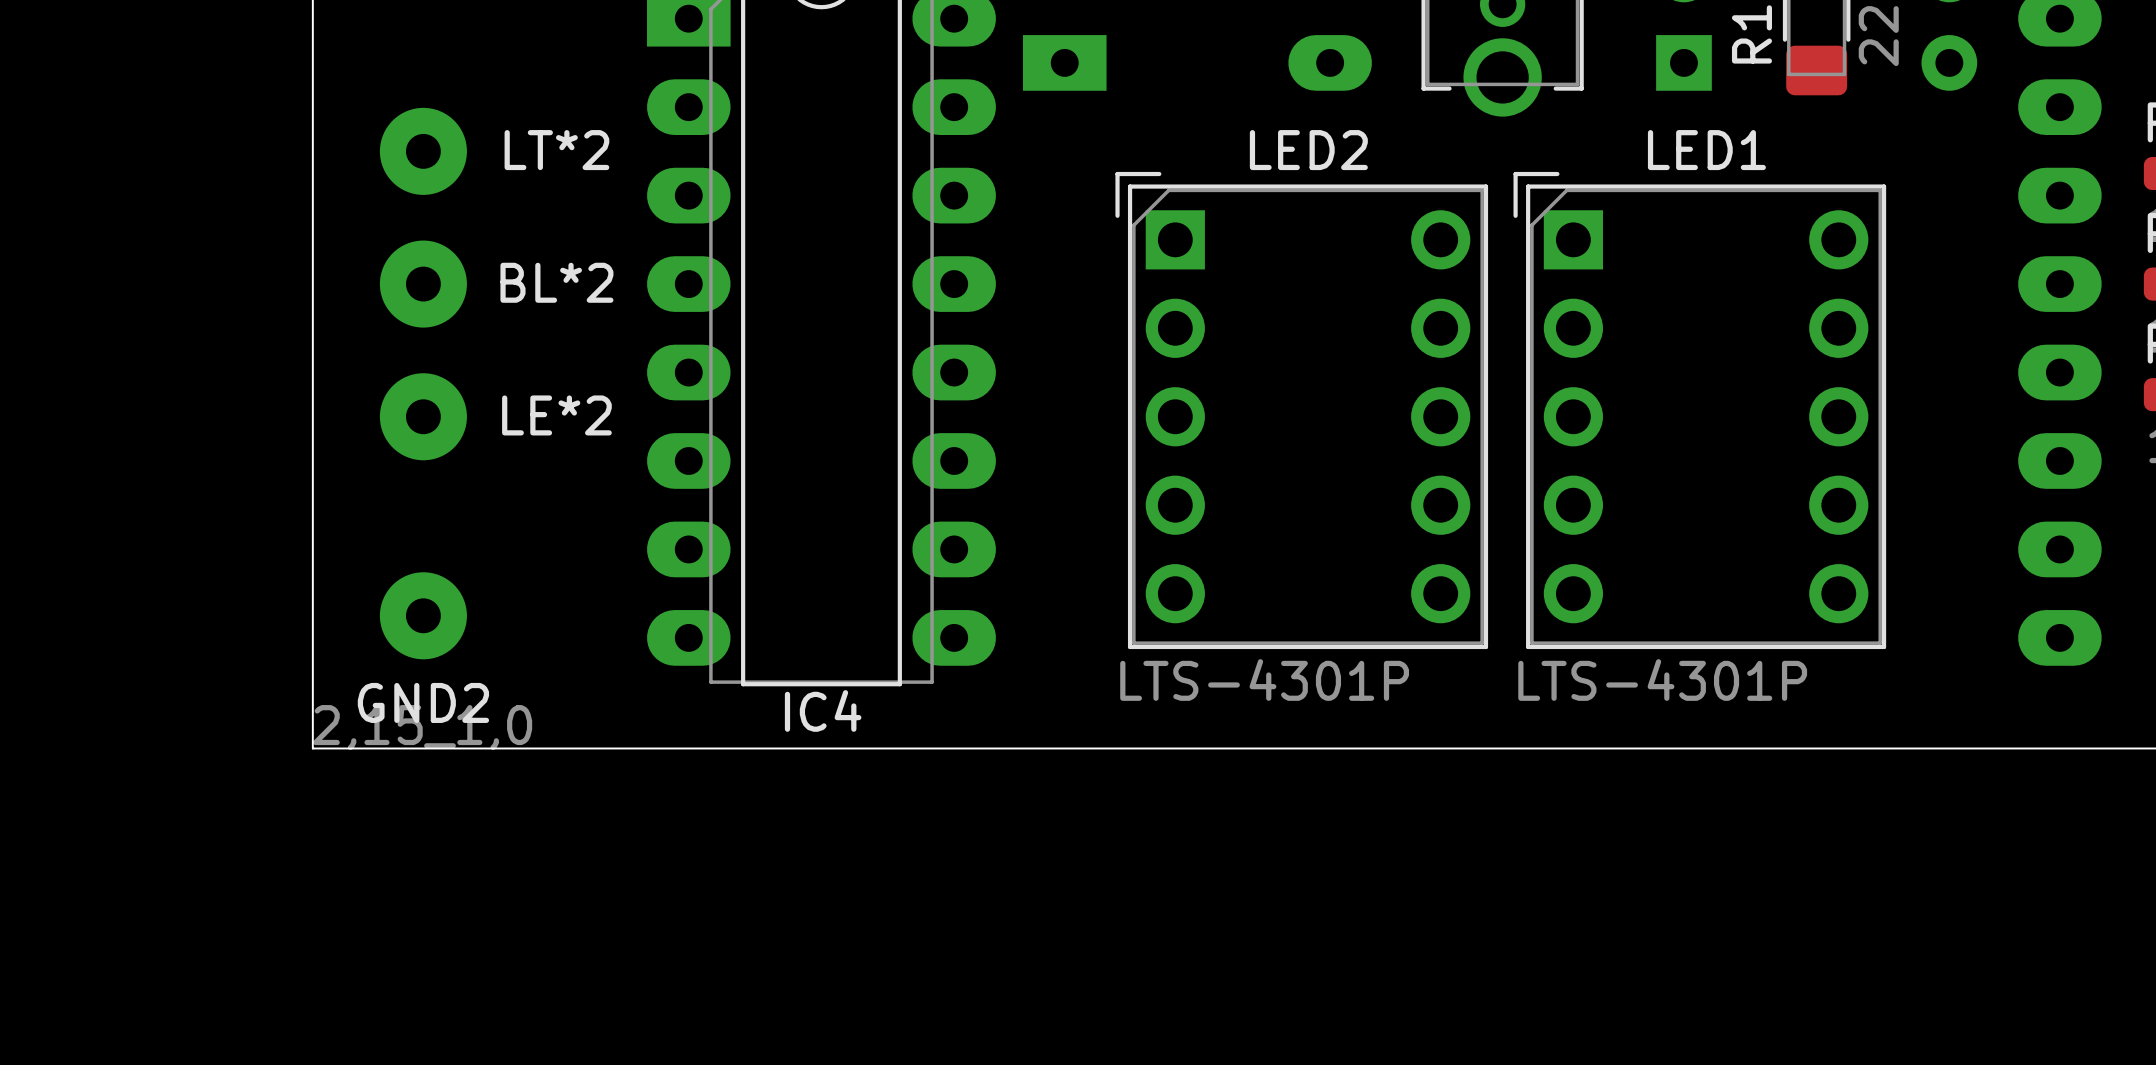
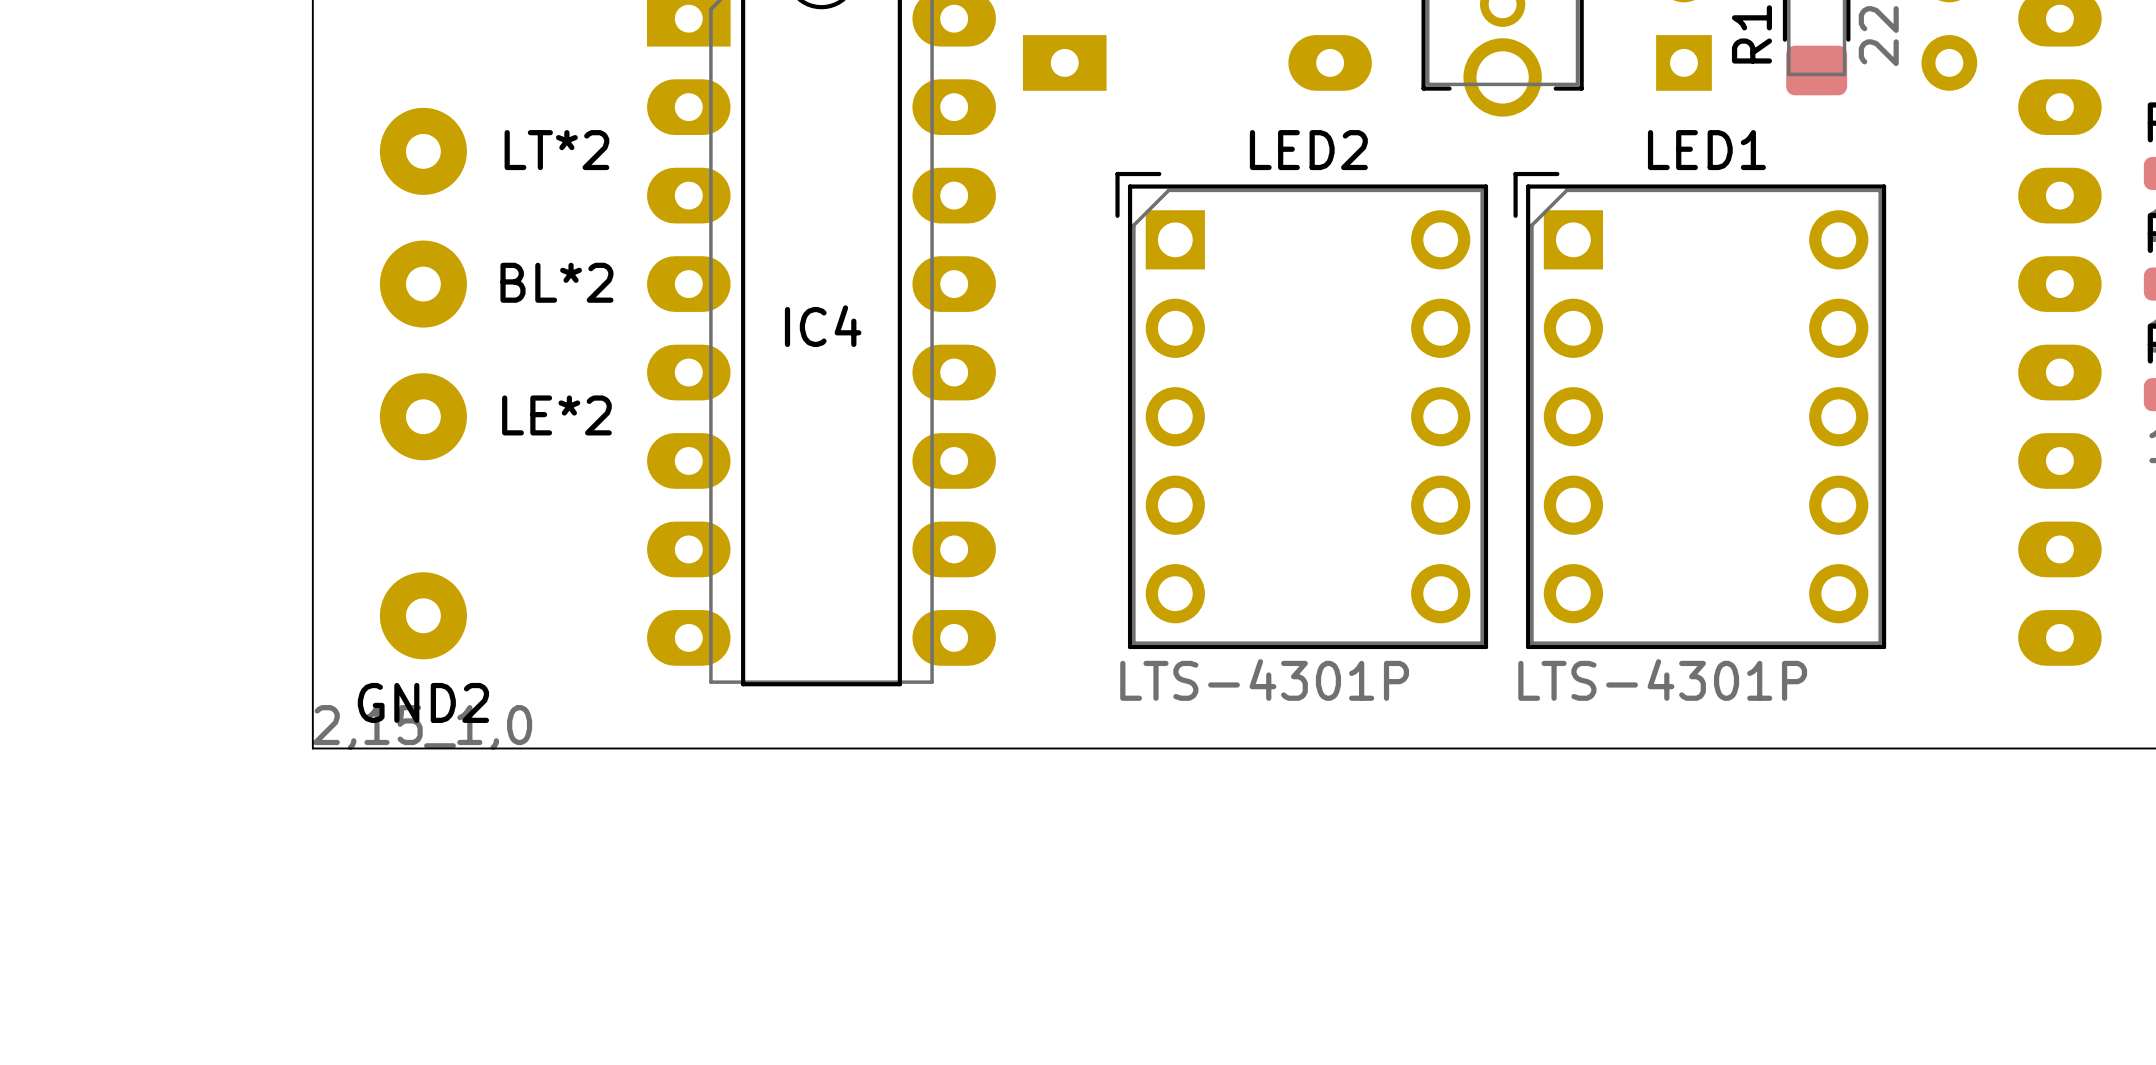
IC4 name position: IC4 (823, 710) -> IC4 (823, 326)

